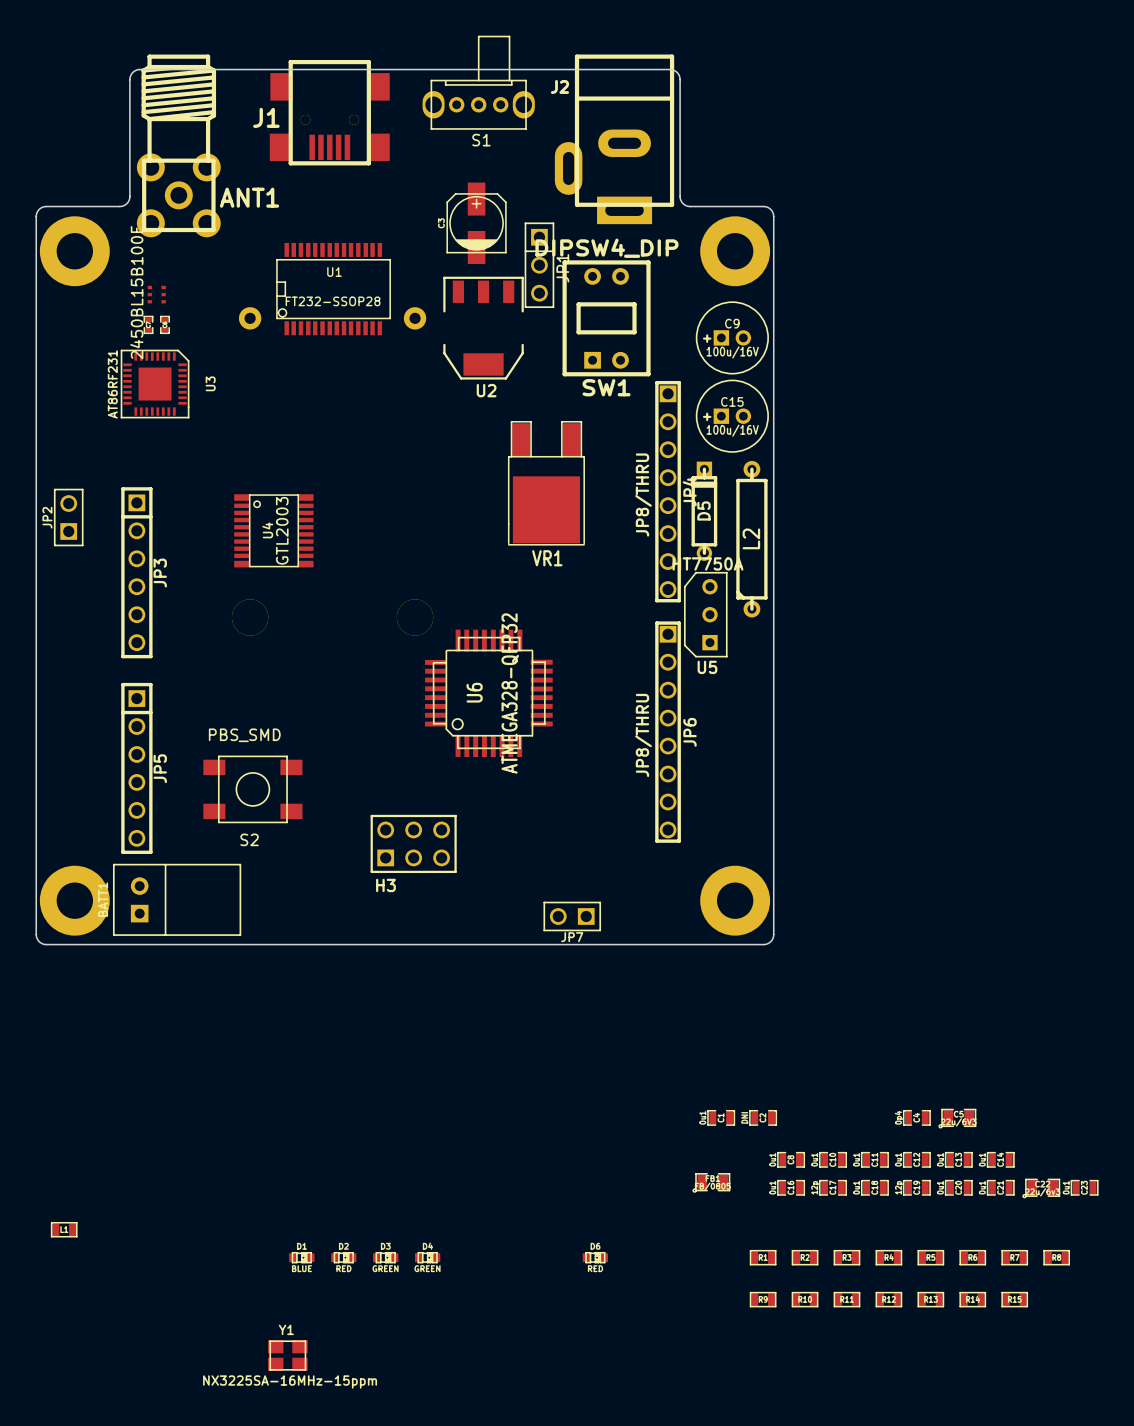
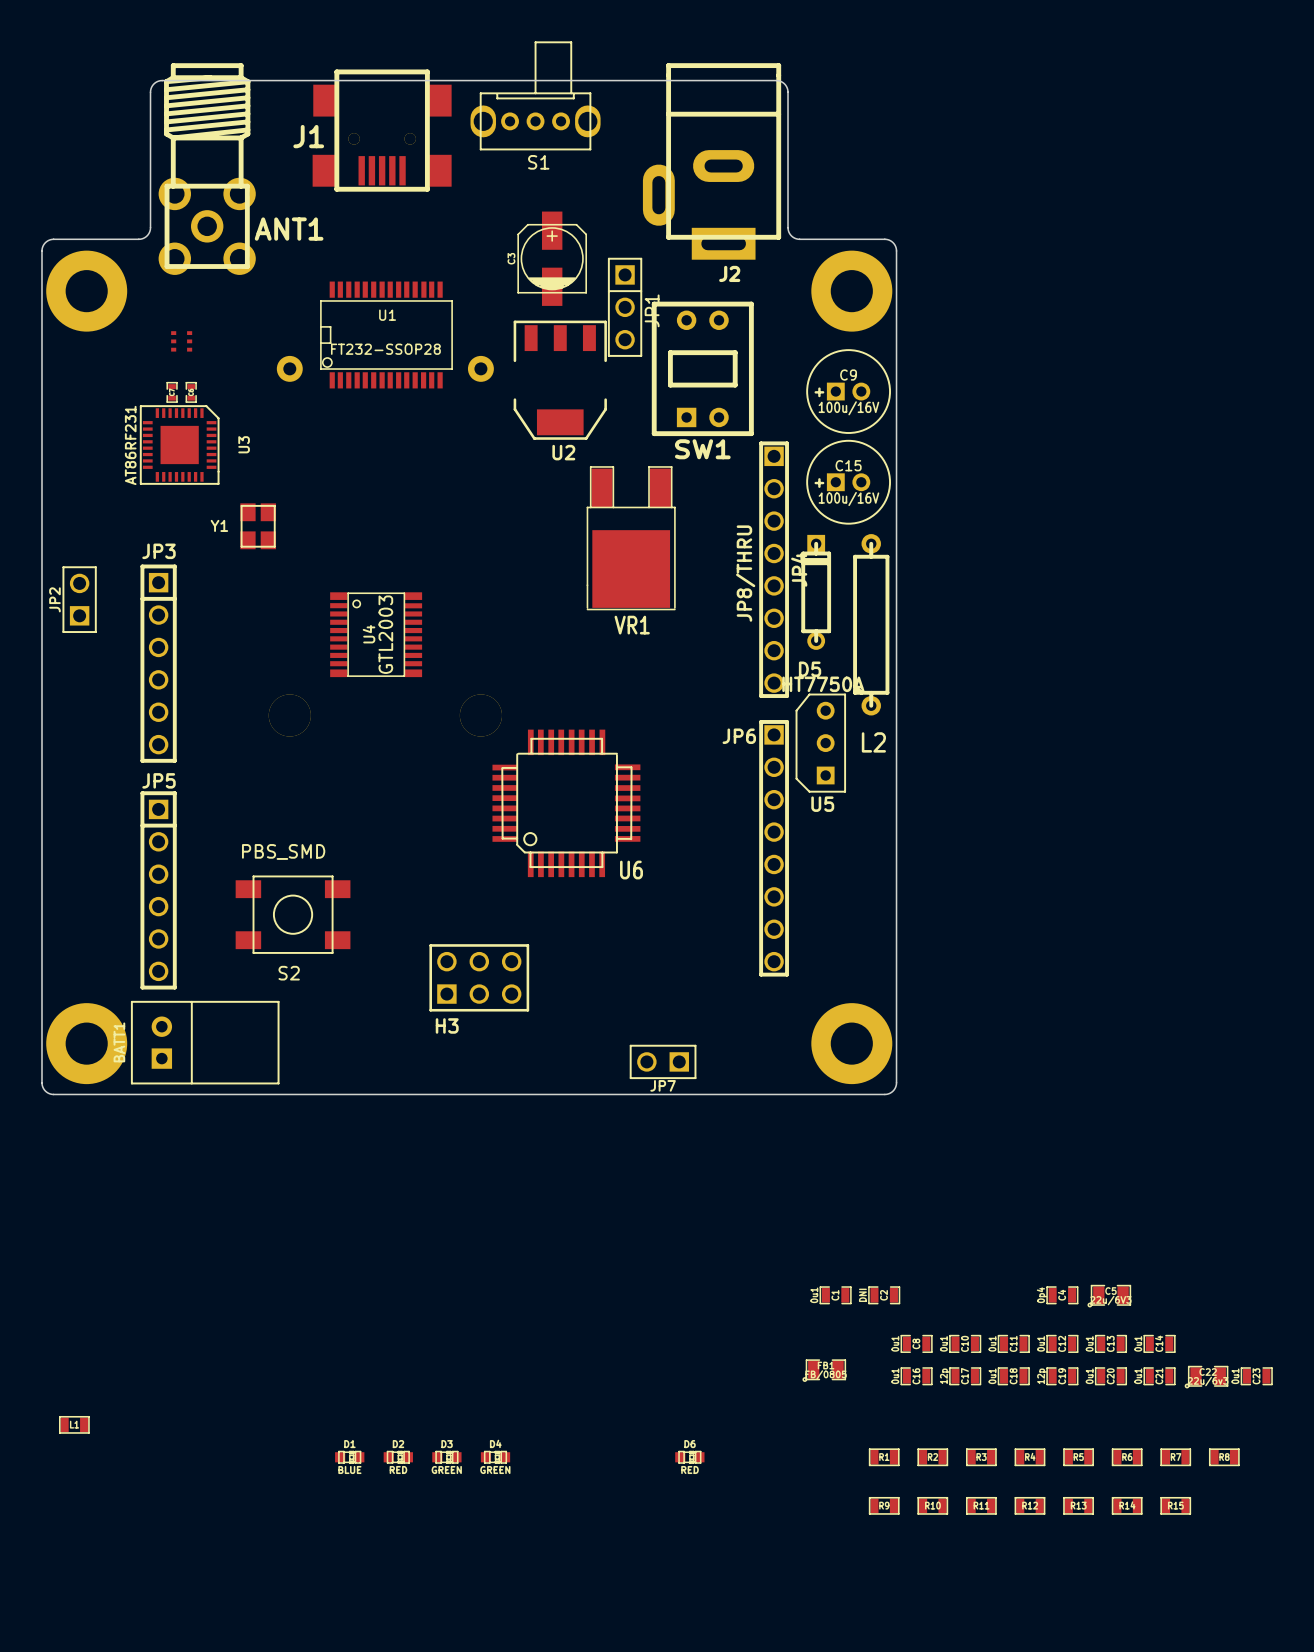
S1 position: (478, 82) -> (535, 95)
J2 name position: J2 (559, 86) -> J2 (729, 273)
SW1 value: DIPSW4_DIP (606, 248) -> none
part value: 2450BL15B100E (136, 292) -> none
part position: (148, 324) -> (172, 392)
part position: (165, 324) -> (191, 392)
VR1 position: (546, 483) -> (631, 538)
D5 name rotation: 0° (703, 510) -> 90° clockwise (810, 669)
D5 name position: D5 (703, 510) -> D5 (810, 669)
U4 position: (273, 530) -> (376, 634)
L2 name rotation: 0° (751, 538) -> 90° clockwise (873, 742)
L2 name position: L2 (751, 538) -> L2 (873, 742)
JP3 name rotation: 0° (160, 573) -> 90° clockwise (159, 551)
JP3 name position: JP3 (160, 573) -> JP3 (159, 551)
U5 position: (705, 614) -> (820, 743)
U6 name rotation: 0° (474, 692) -> 90° clockwise (631, 870)
U6 name position: U6 (474, 692) -> U6 (631, 870)
U6 value: ATMEGA328-QFP32 (510, 693) -> none
JP6 name rotation: 0° (690, 732) -> 90° clockwise (739, 736)
JP6 name position: JP6 (690, 732) -> JP6 (739, 736)
JP6 value: JP8/THRU (643, 735) -> none
JP5 name rotation: 0° (160, 768) -> 90° clockwise (159, 780)
JP5 name position: JP5 (160, 768) -> JP5 (159, 780)
Y1 name position: Y1 (286, 1329) -> Y1 (219, 525)
Y1 rotation: 0° (287, 1355) -> 90° clockwise (258, 526)
Y1 position: (287, 1355) -> (258, 526)
Y1 value: NX3225SA-16MHz-15ppm (290, 1381) -> none

